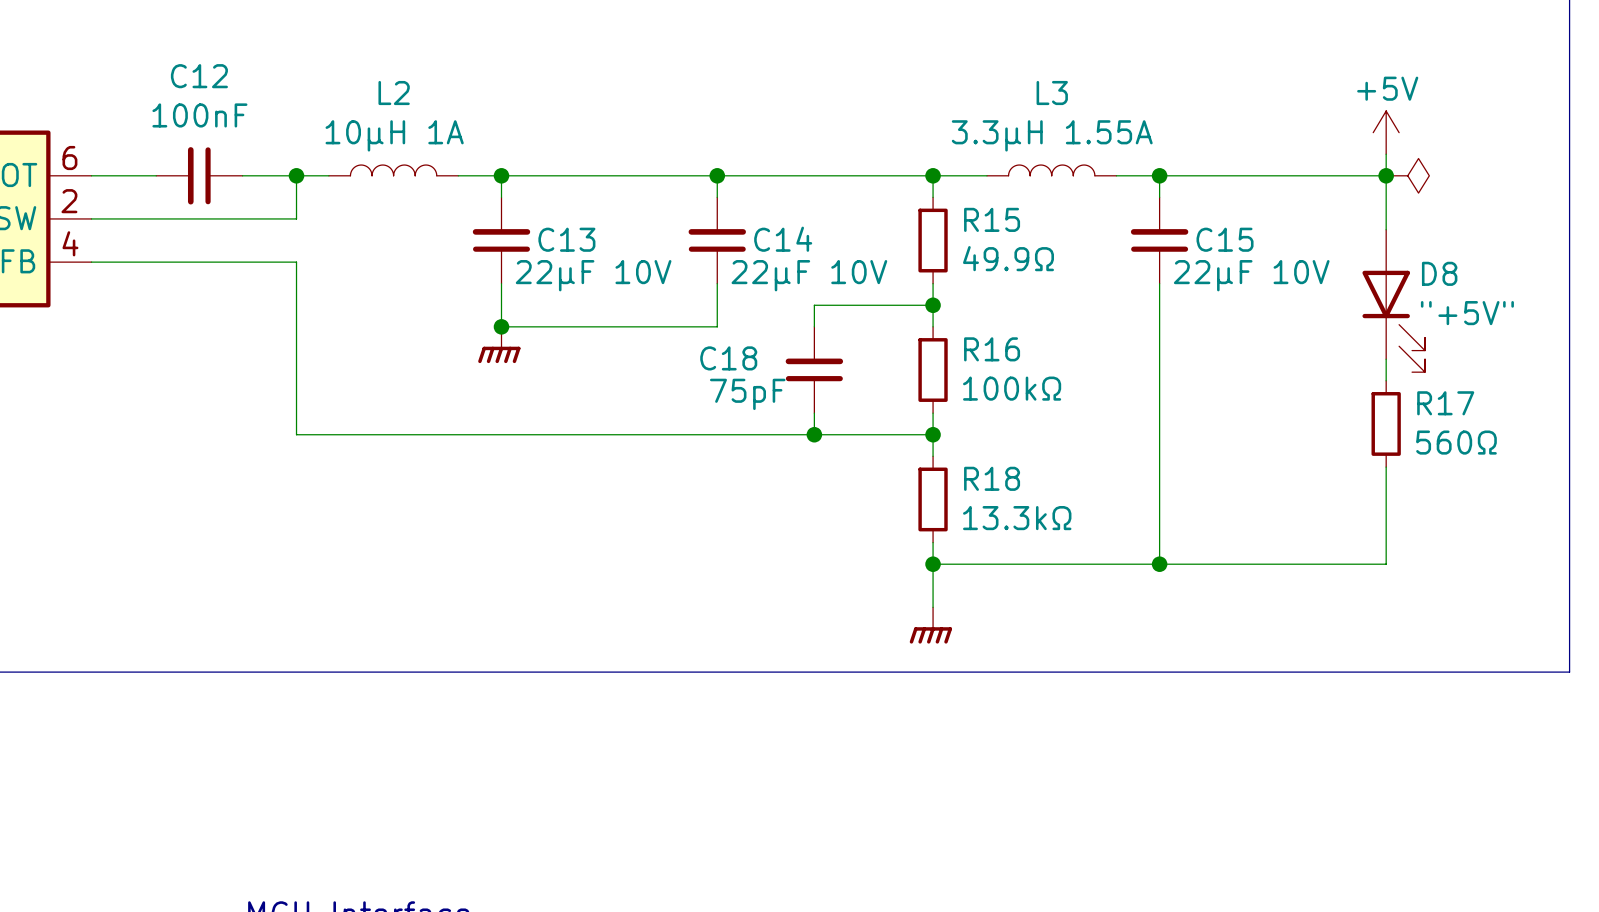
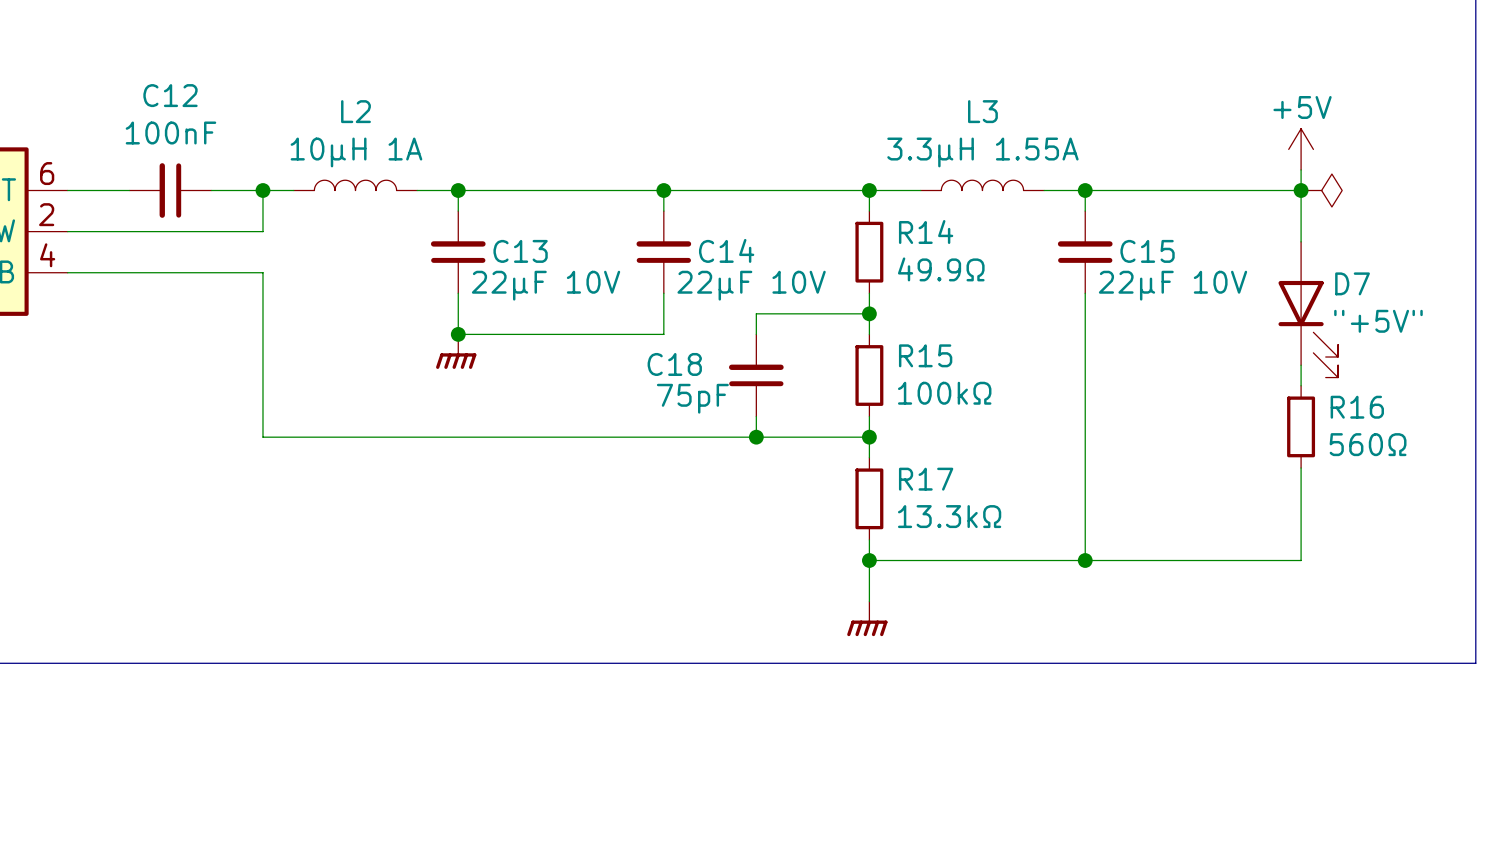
R15 name: R15 (992, 219) -> R14 (926, 232)
D8 name: D8 (1439, 273) -> D7 (1352, 283)
R16 name: R16 (992, 349) -> R15 (925, 355)
R17 name: R17 (1445, 403) -> R16 (1357, 407)
R18 name: R18 (992, 478) -> R17 (926, 479)

